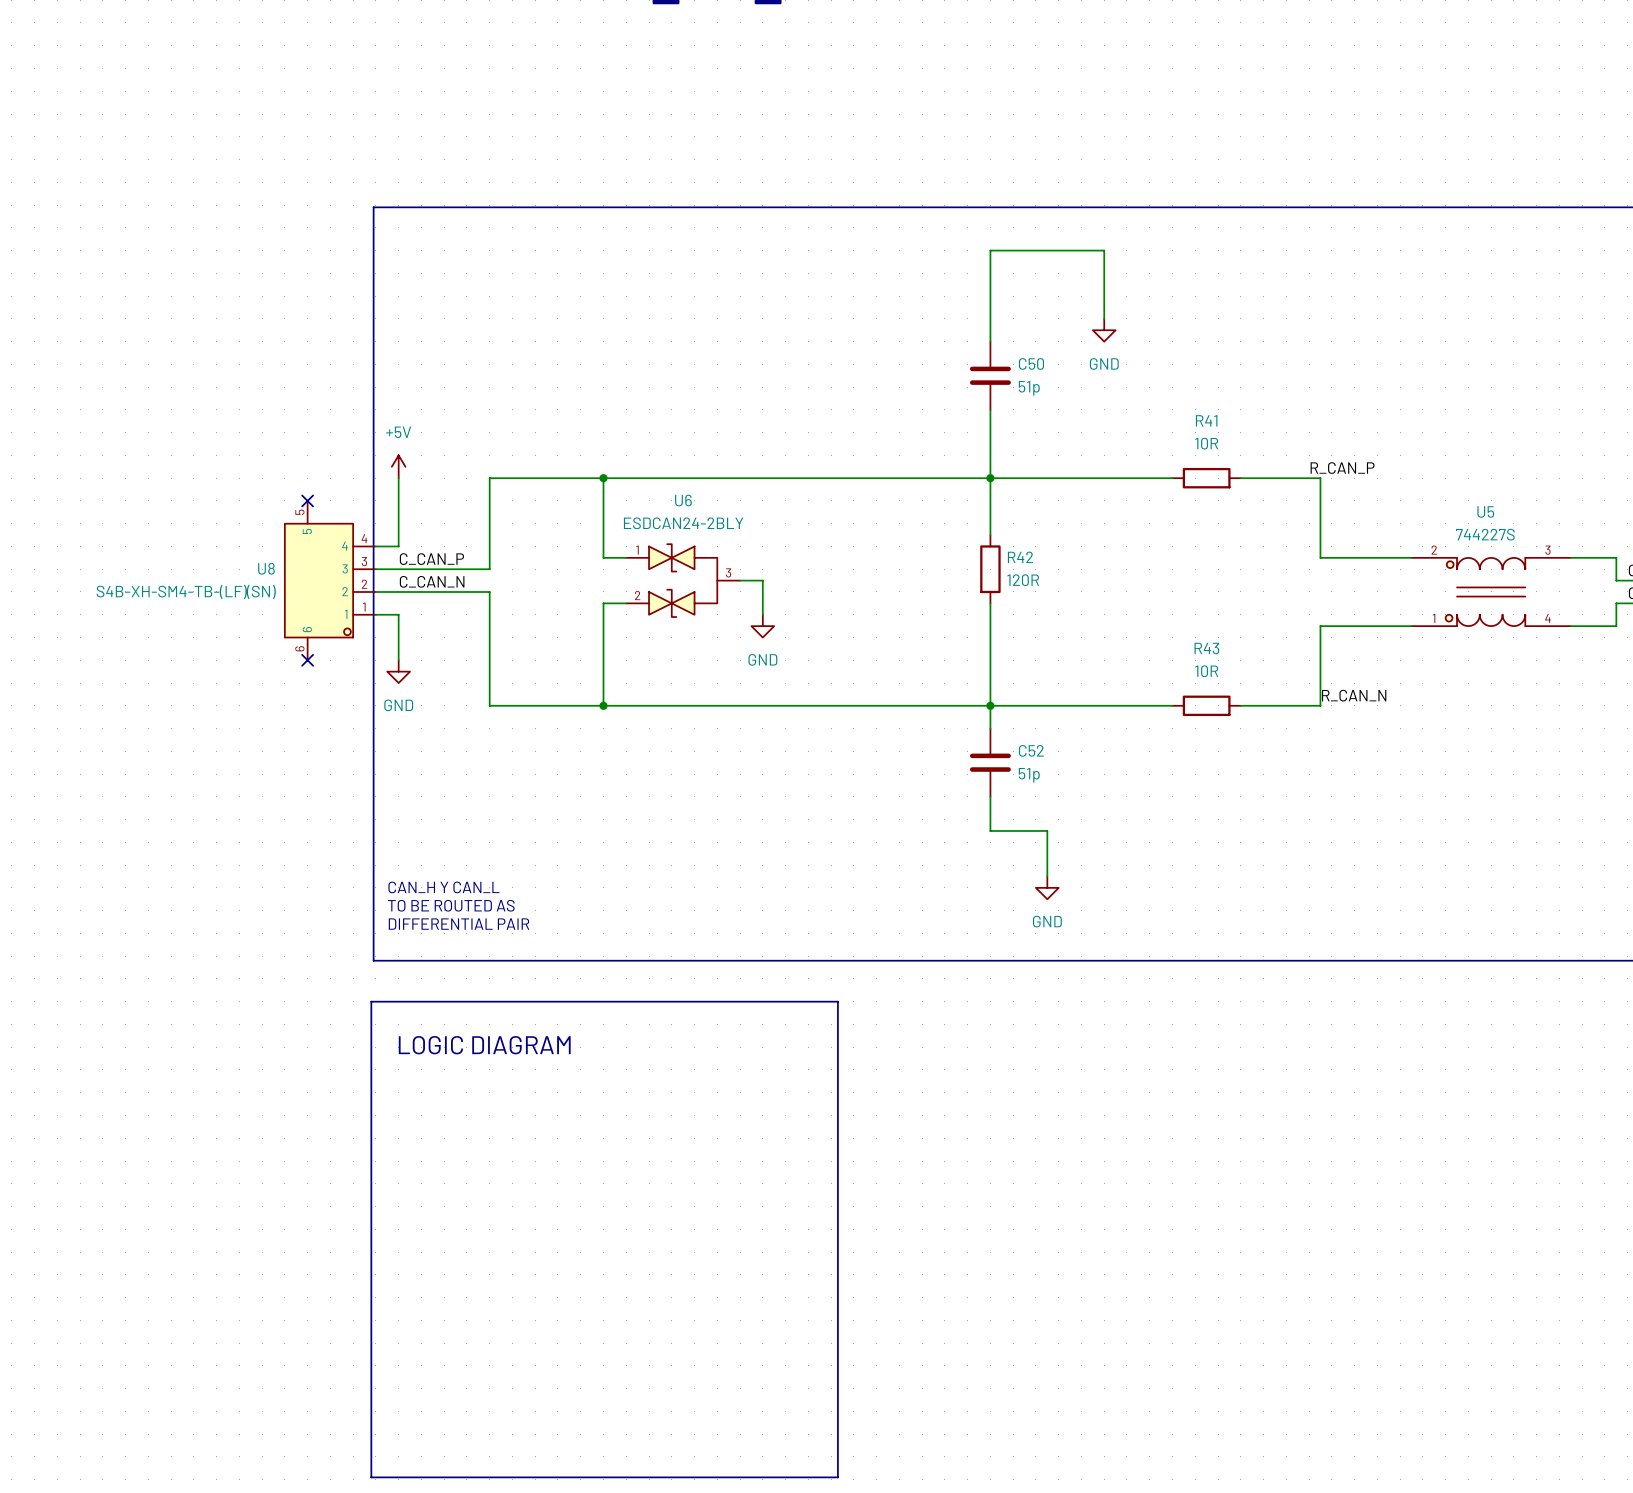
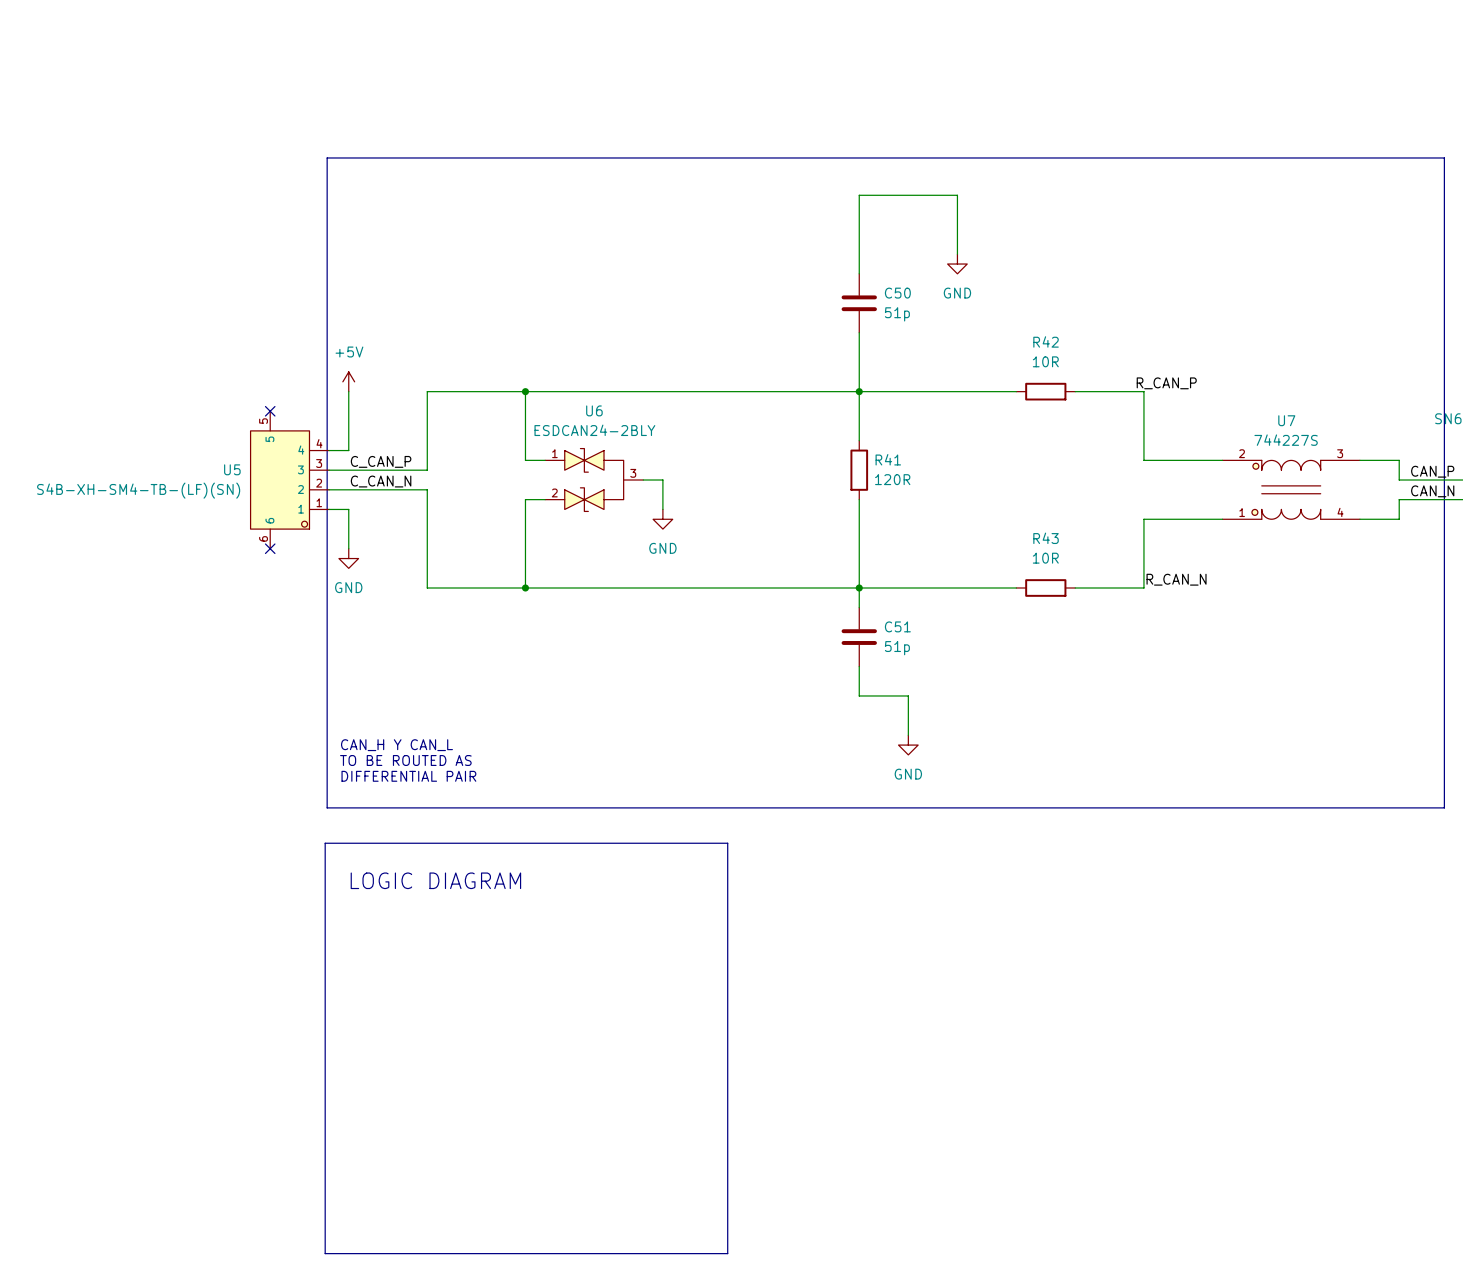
R41 name: R41 (1206, 420) -> R42 (1046, 341)
U5 name: U5 (1485, 511) -> U7 (1286, 420)
R42 name: R42 (1020, 557) -> R41 (888, 459)
U8 name: U8 (266, 568) -> U5 (232, 469)
C52 name: C52 (1031, 750) -> C51 (897, 626)

